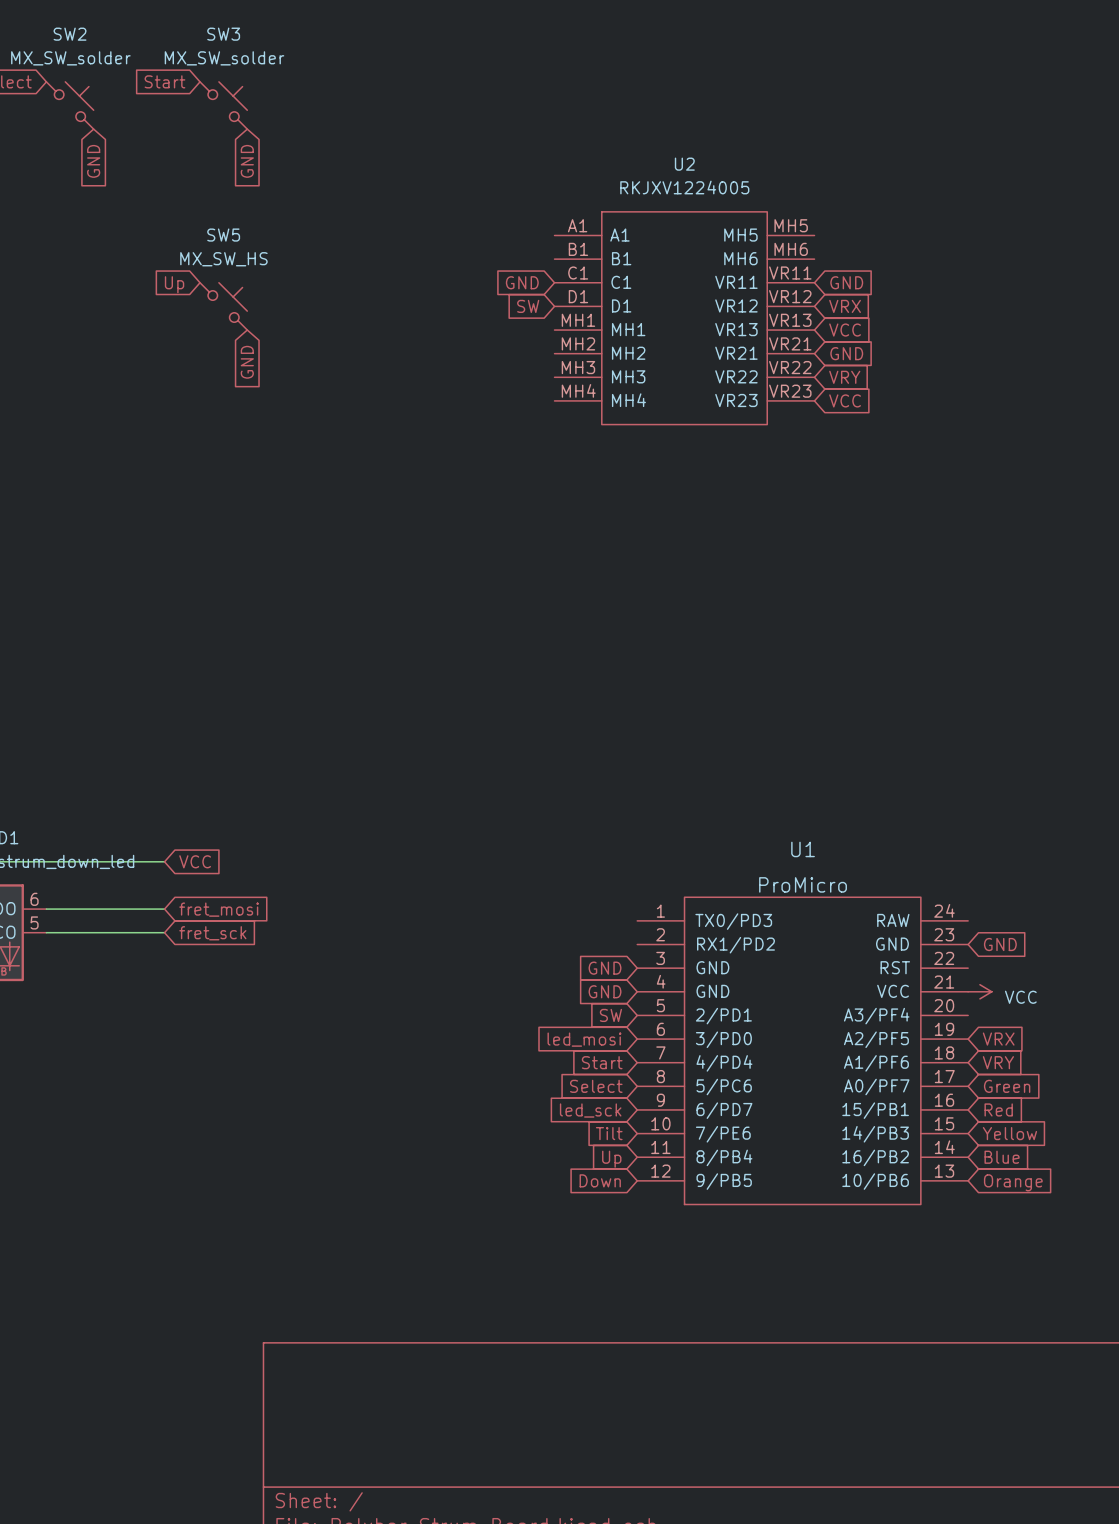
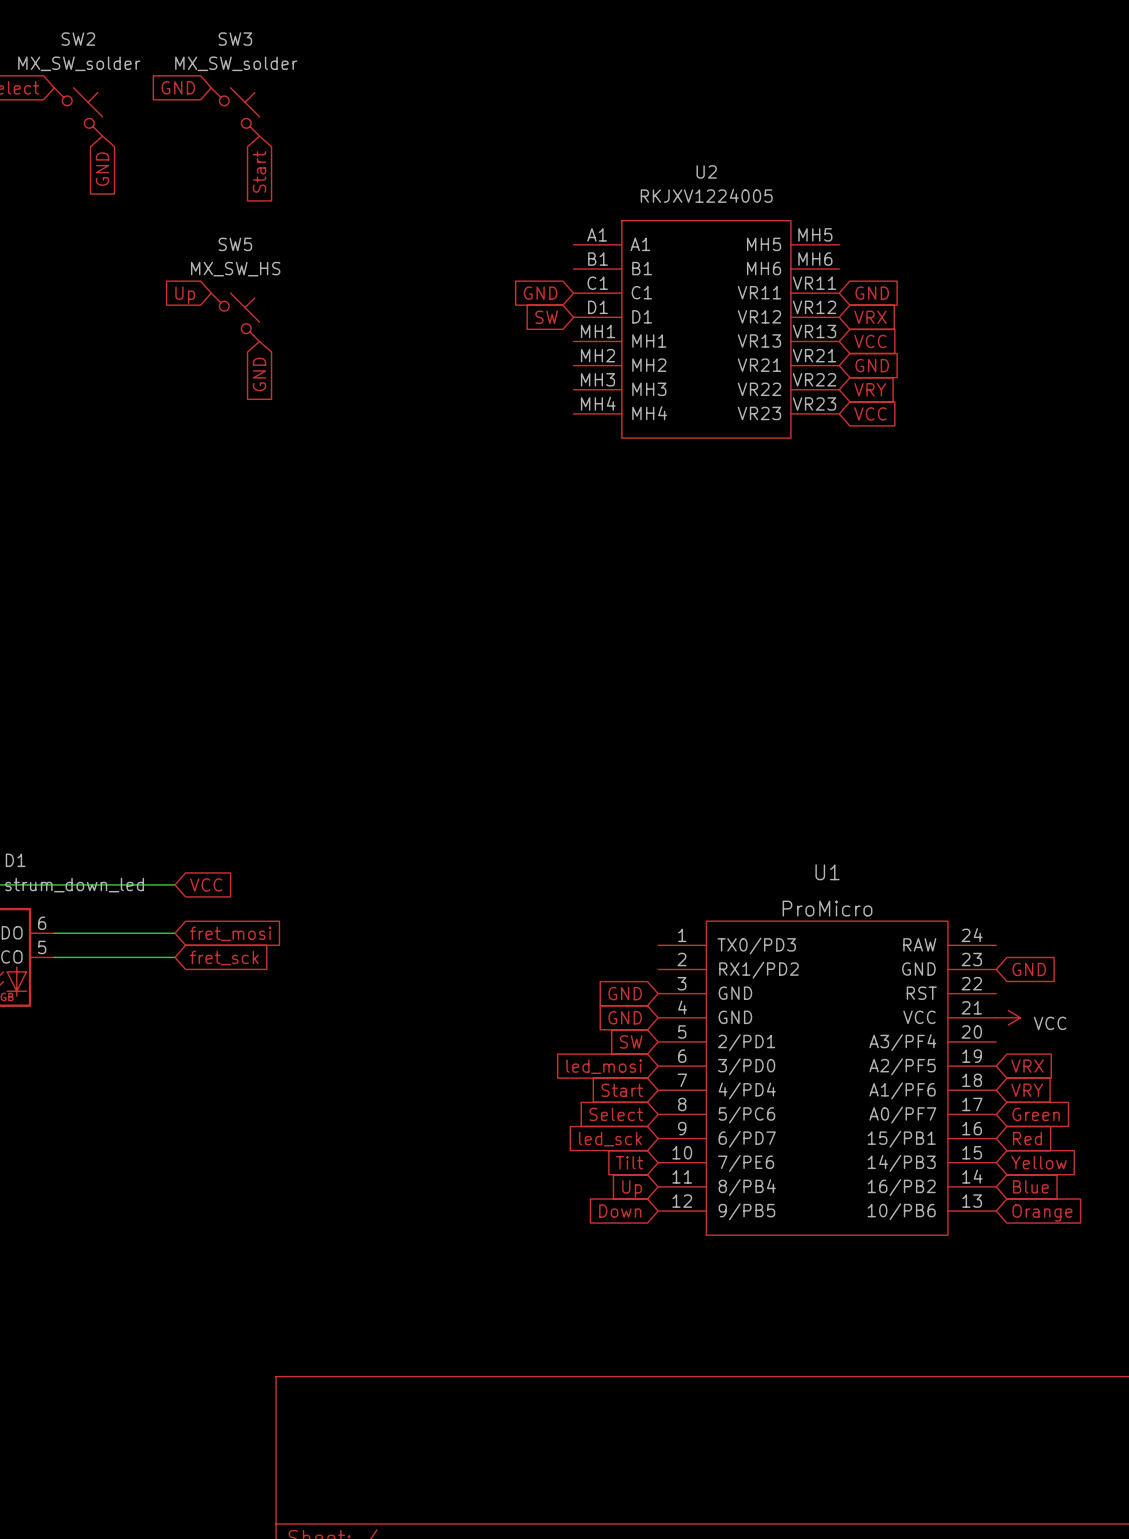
global label: Start (164, 81) -> GND (178, 87)
global label: GND (247, 161) -> Start (259, 171)

